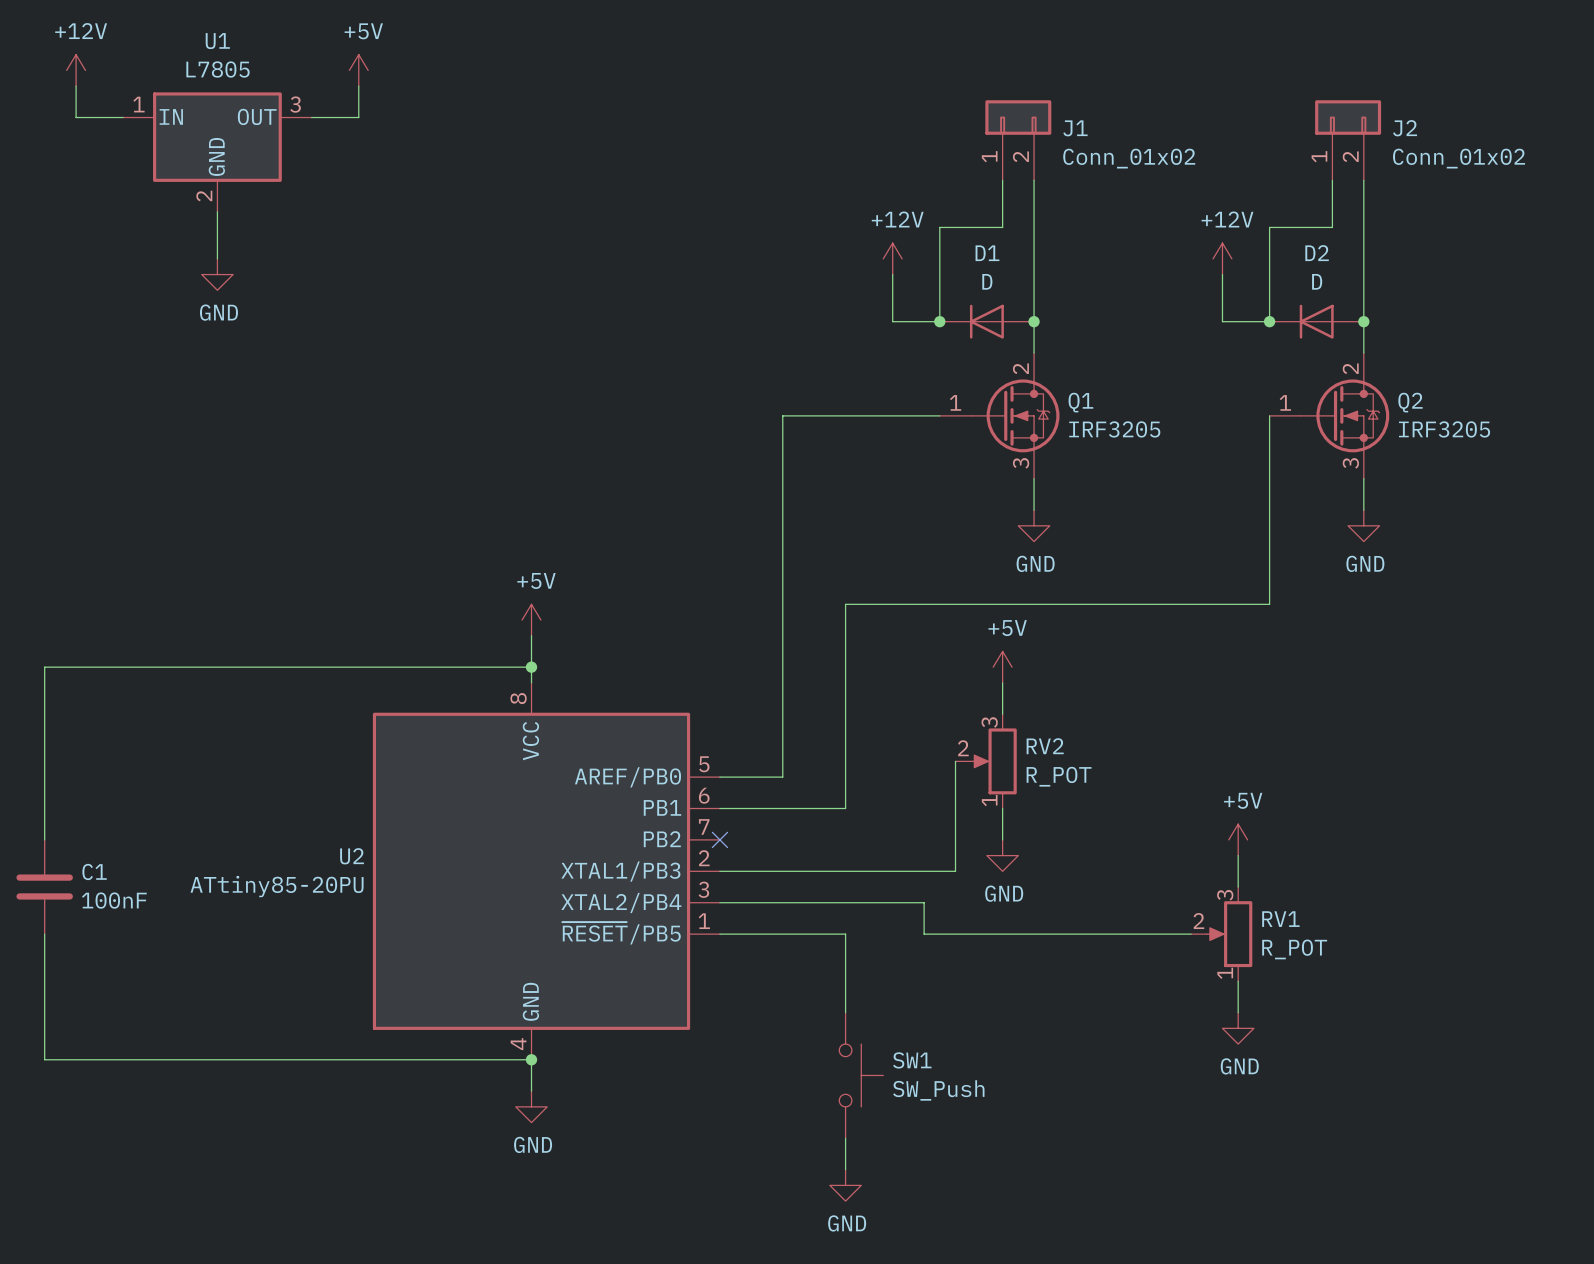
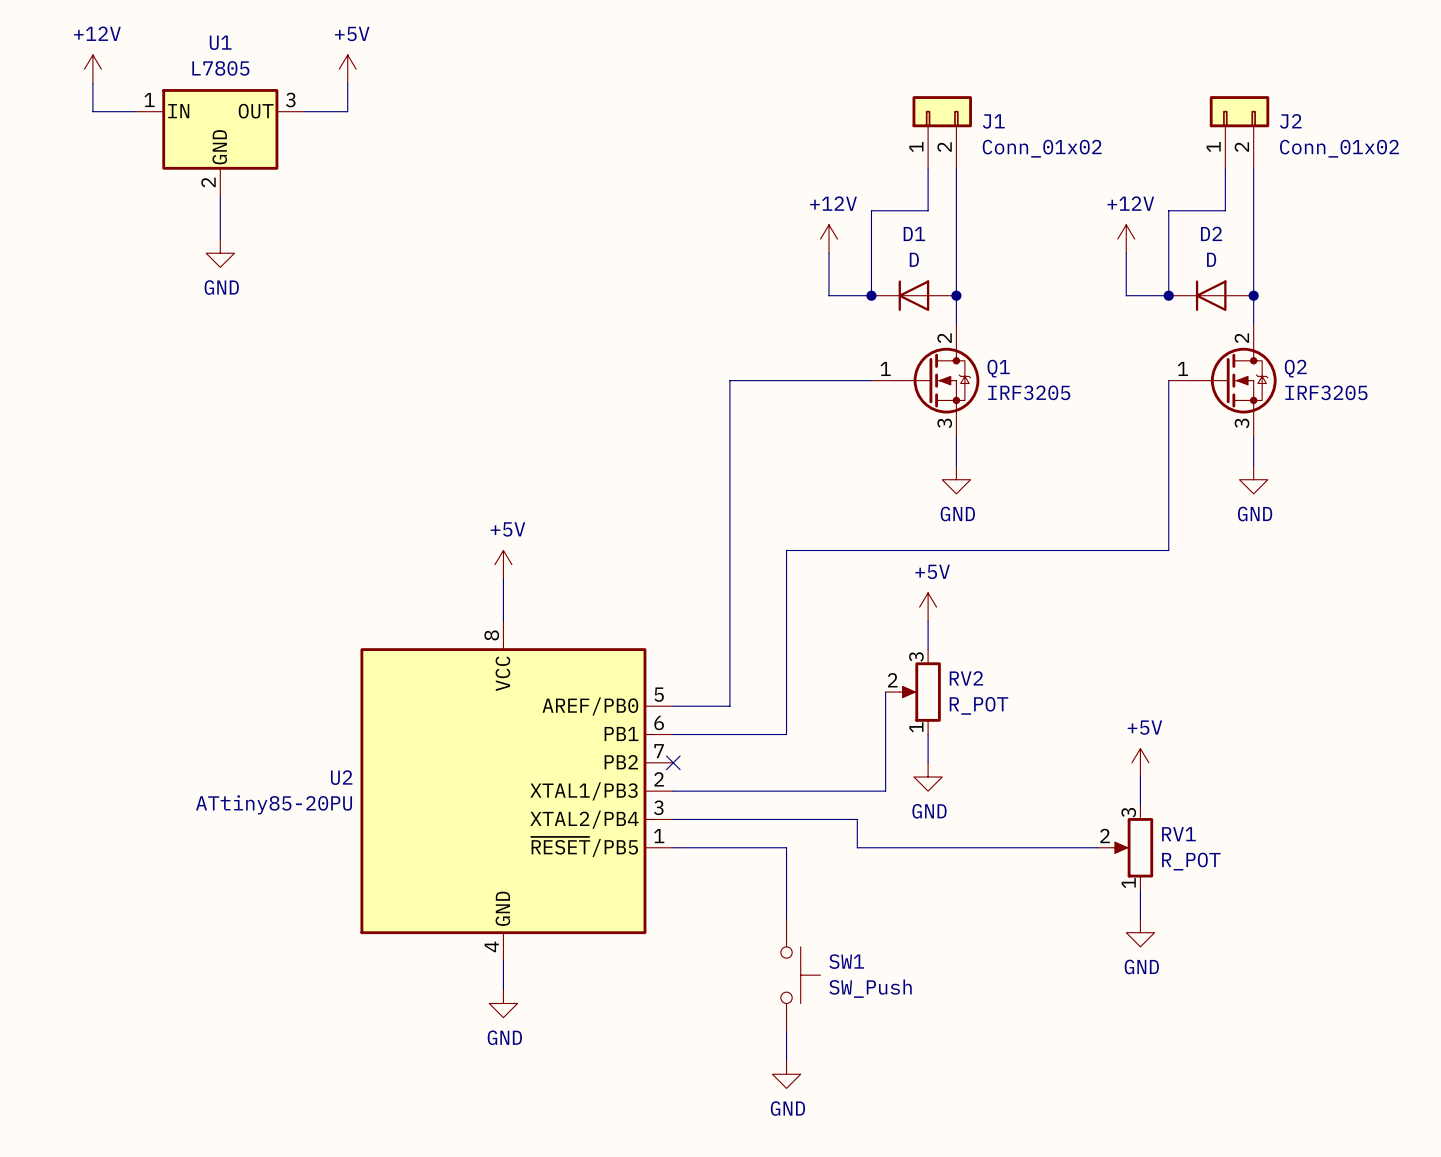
wire: (531, 667) (44, 667) (44, 839) -> none
junction: (531, 667) -> none
C1: 100nF (44, 887) -> none
wire: (44, 934) (44, 1059) (531, 1059) -> none
junction: (531, 1059) -> none

